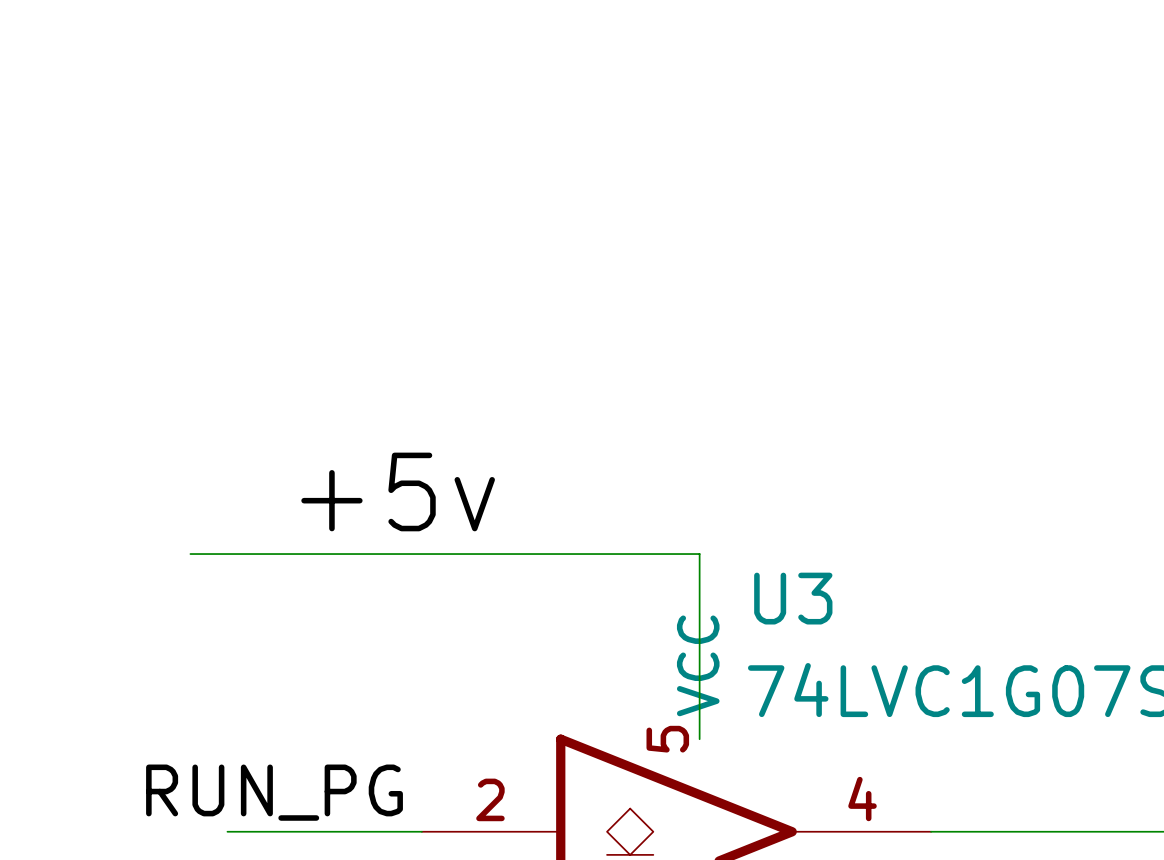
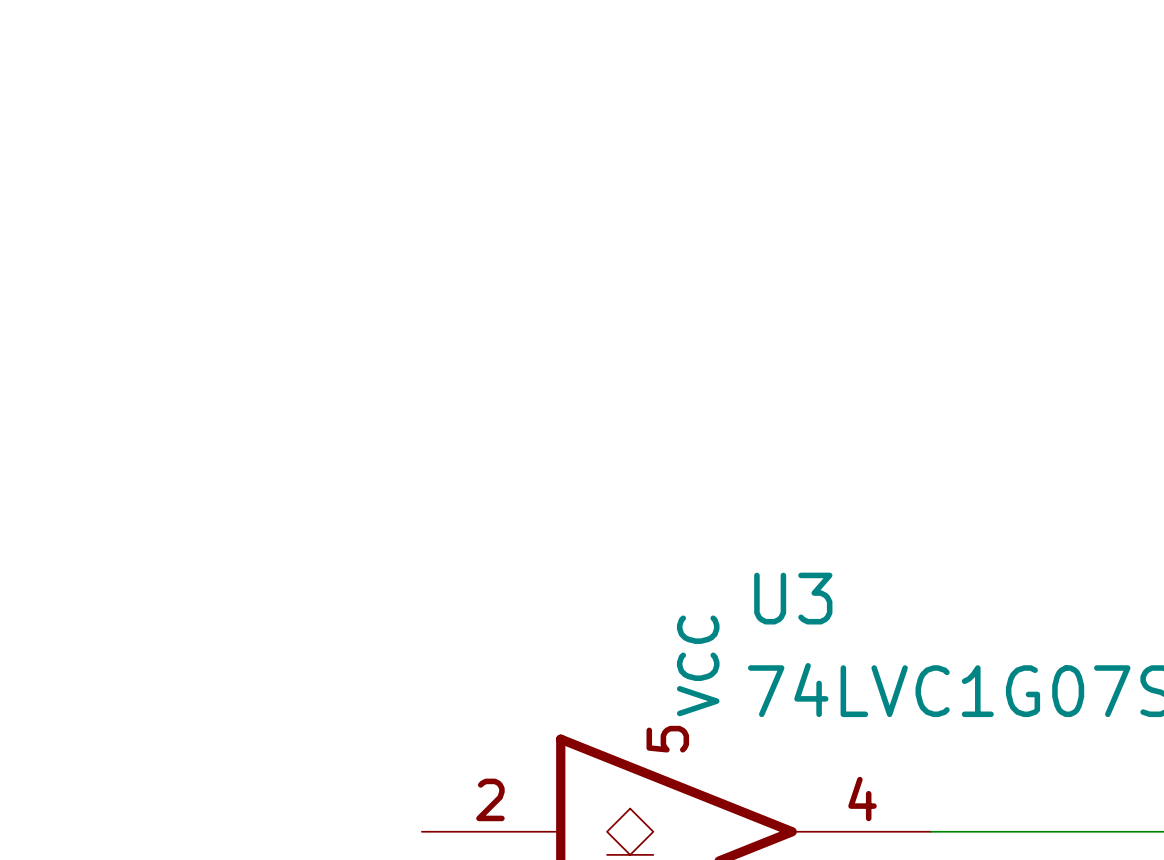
label: +5v (398, 491) -> none
wire: (190, 554) (699, 554) (699, 739) -> none
label: RUN_PG (274, 792) -> none
wire: (227, 831) (421, 831) -> none

